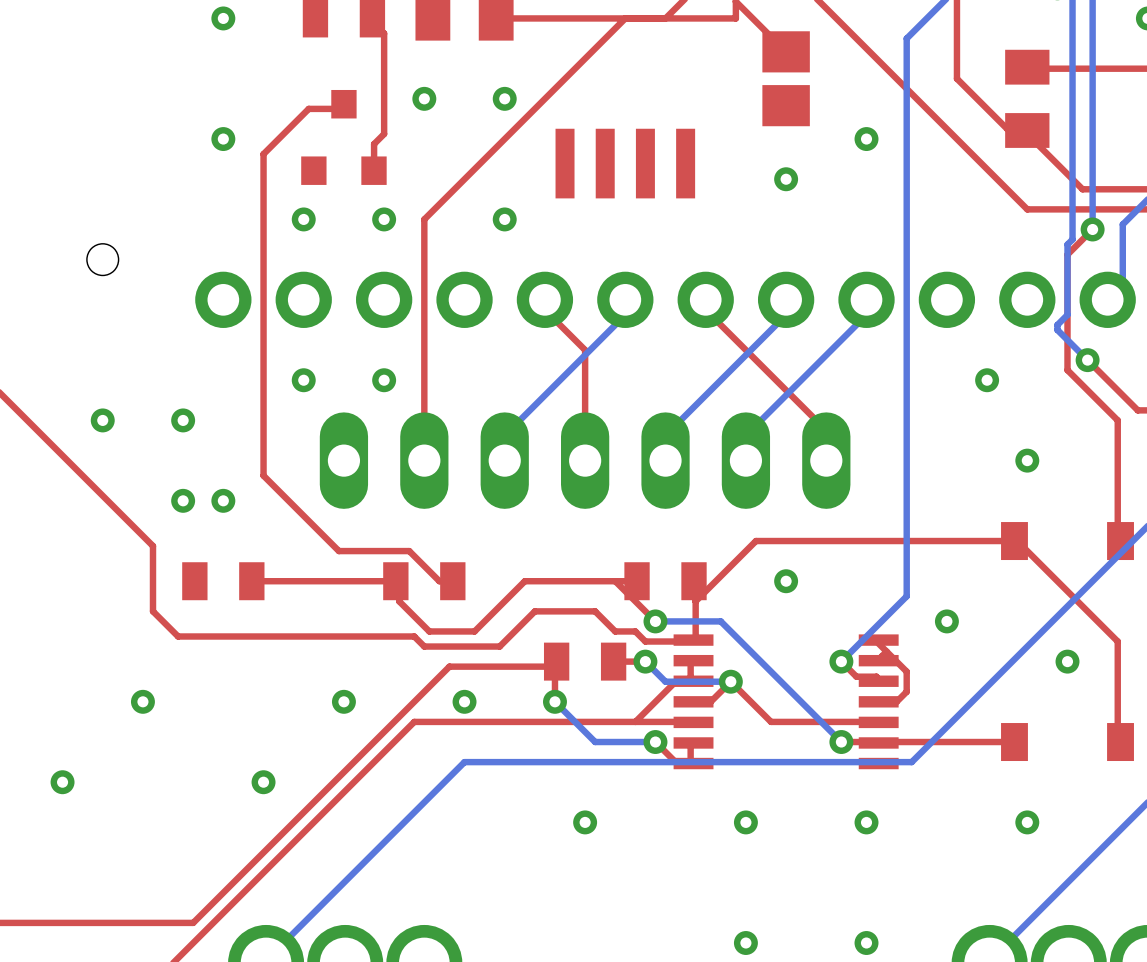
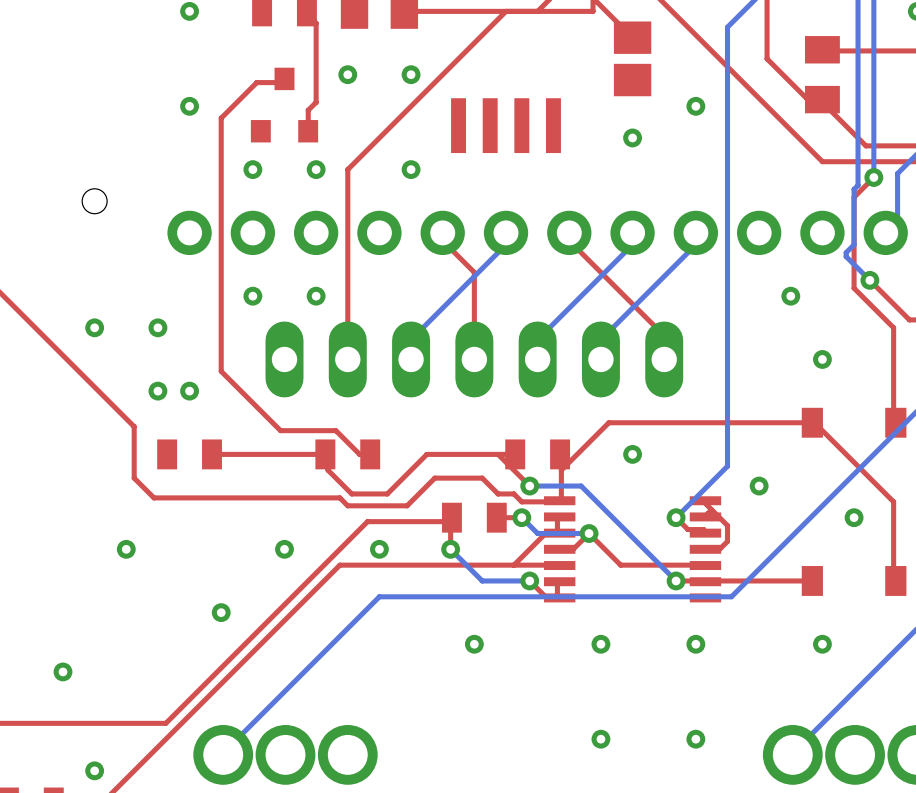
via position: (62, 782) -> (63, 671)

